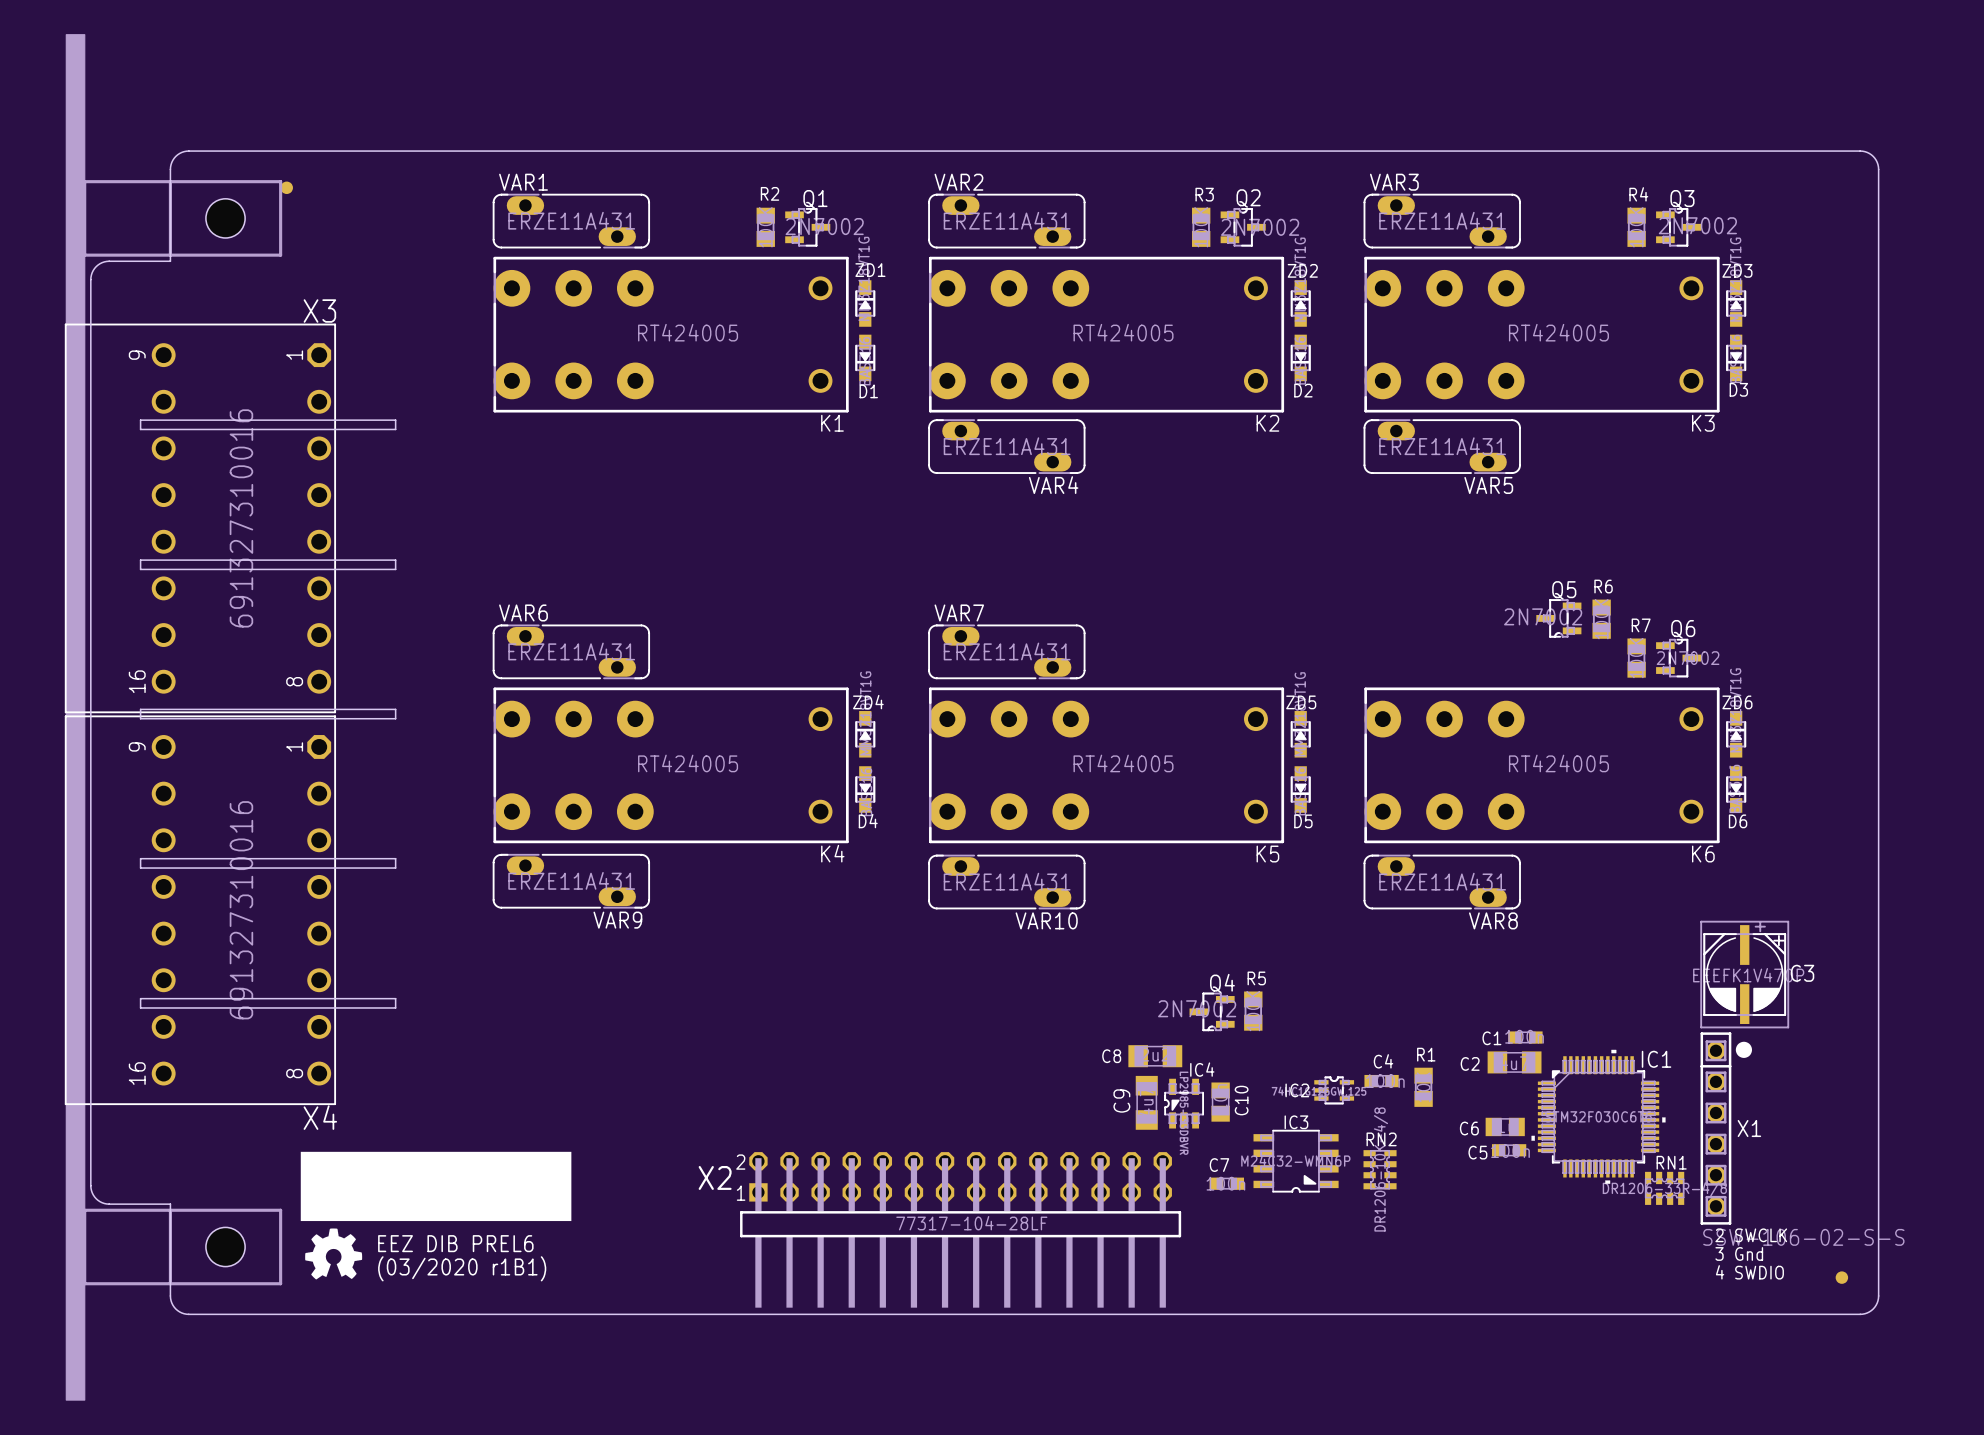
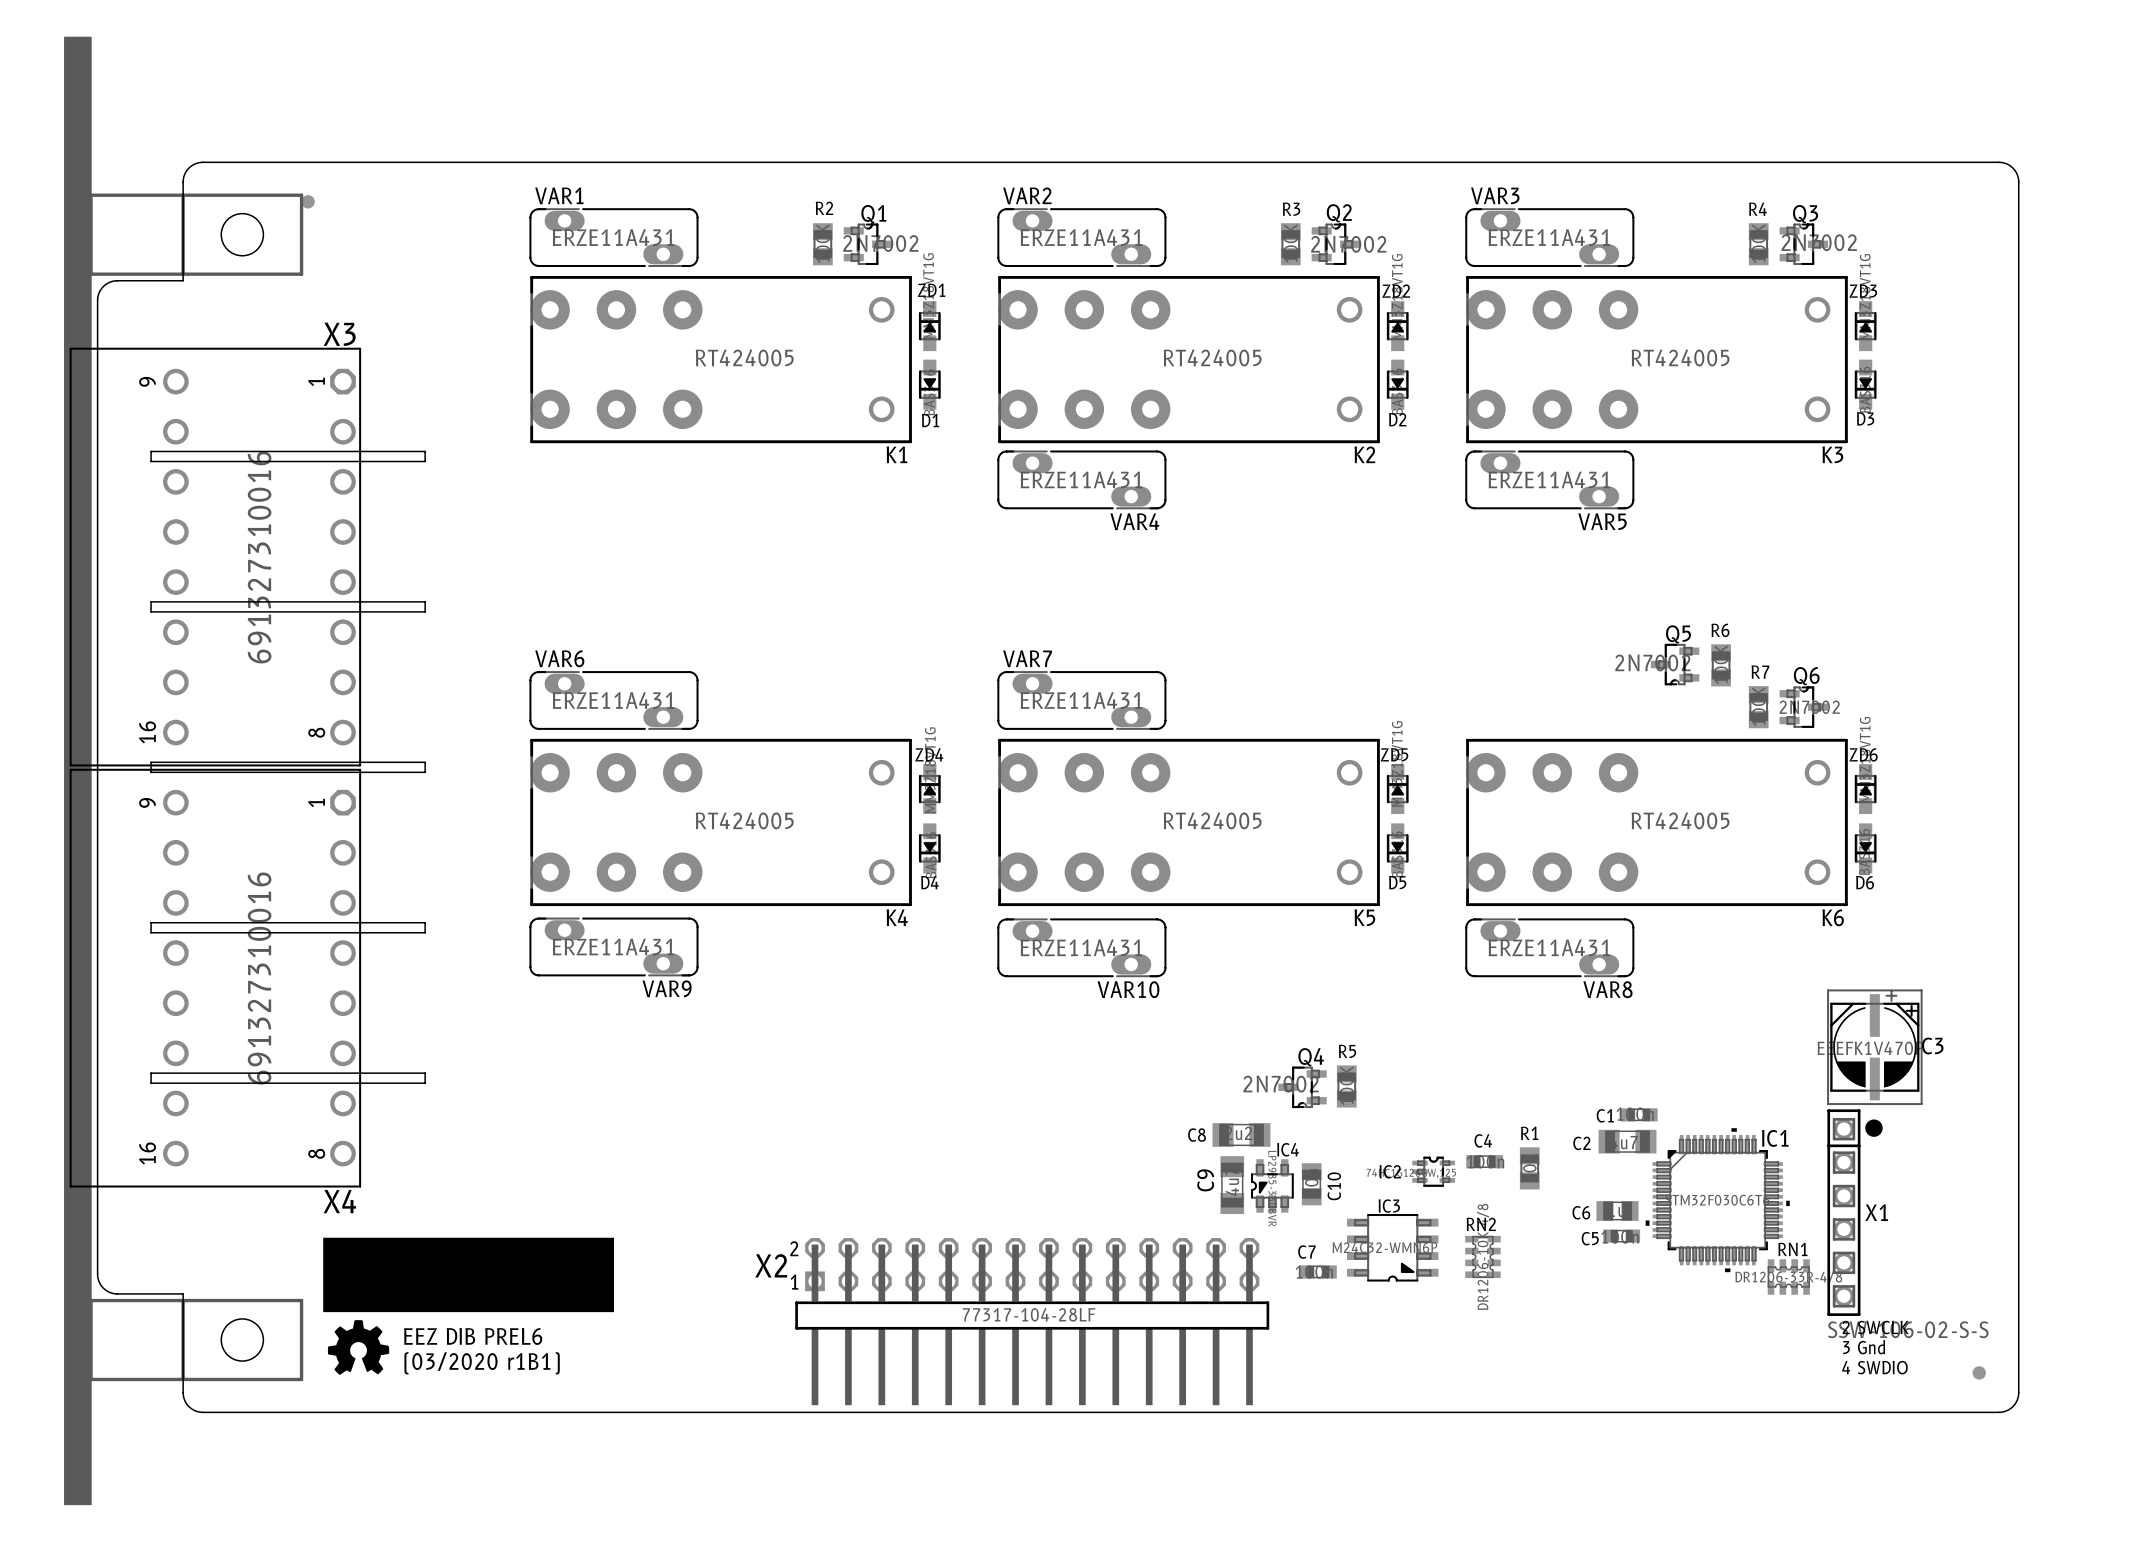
drawing shape: [65, 34, 86, 1401] -> [64, 36, 92, 1506]

